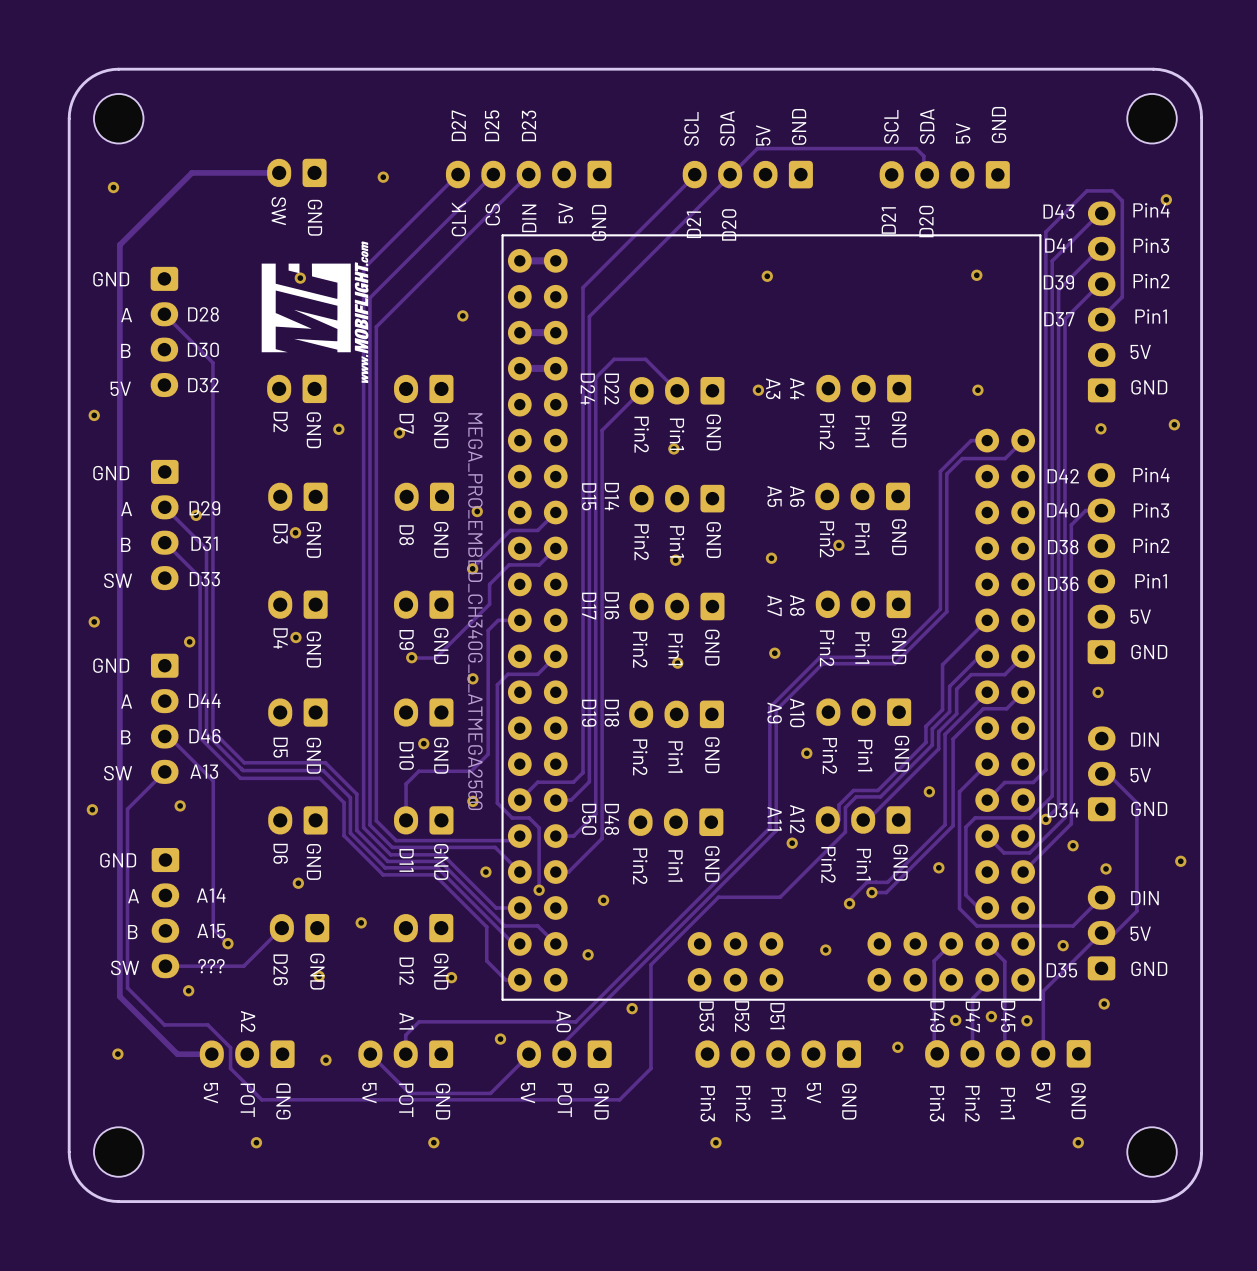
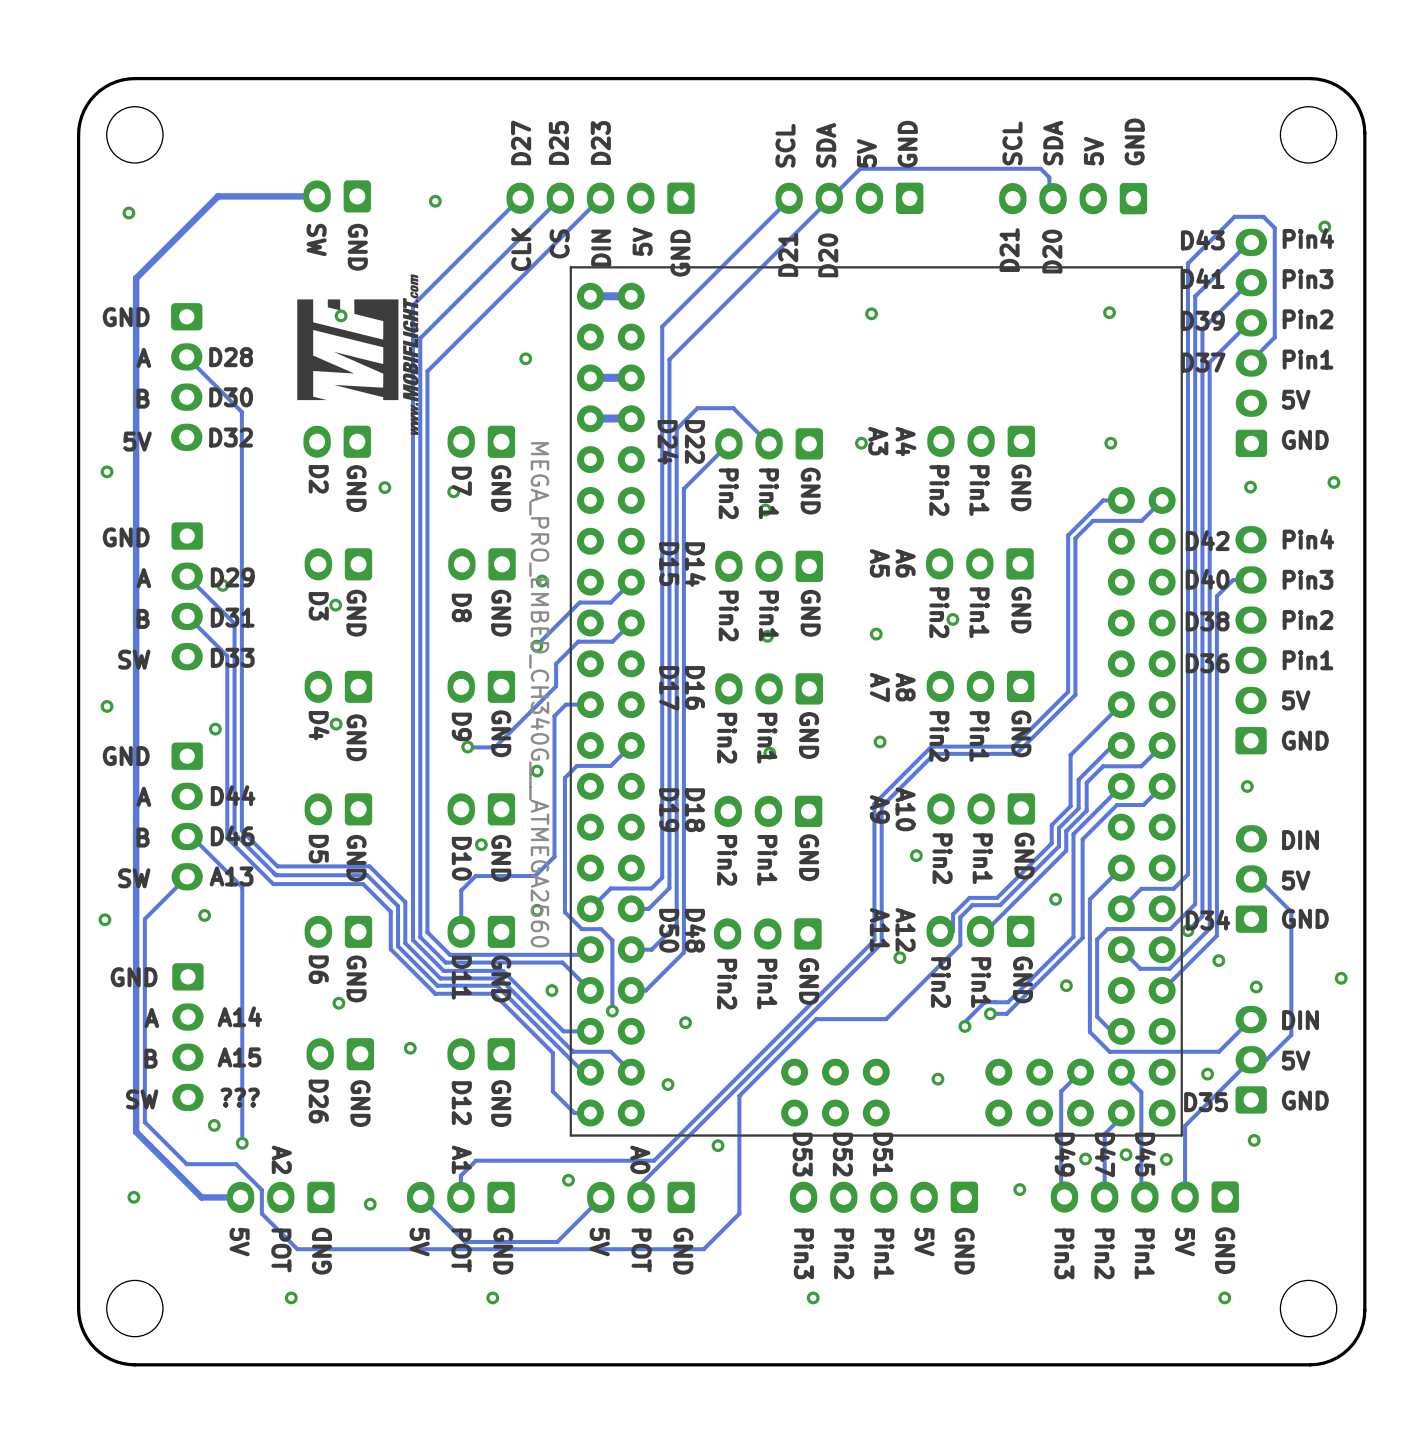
track: (213, 928) (227, 943) -> (242, 1055) (242, 1143)
track: (281, 928) (243, 966) (165, 966) -> none
via: (227, 943) -> none
via: (319, 976) -> none
via: (451, 977) -> none
via: none -> (242, 1143)

